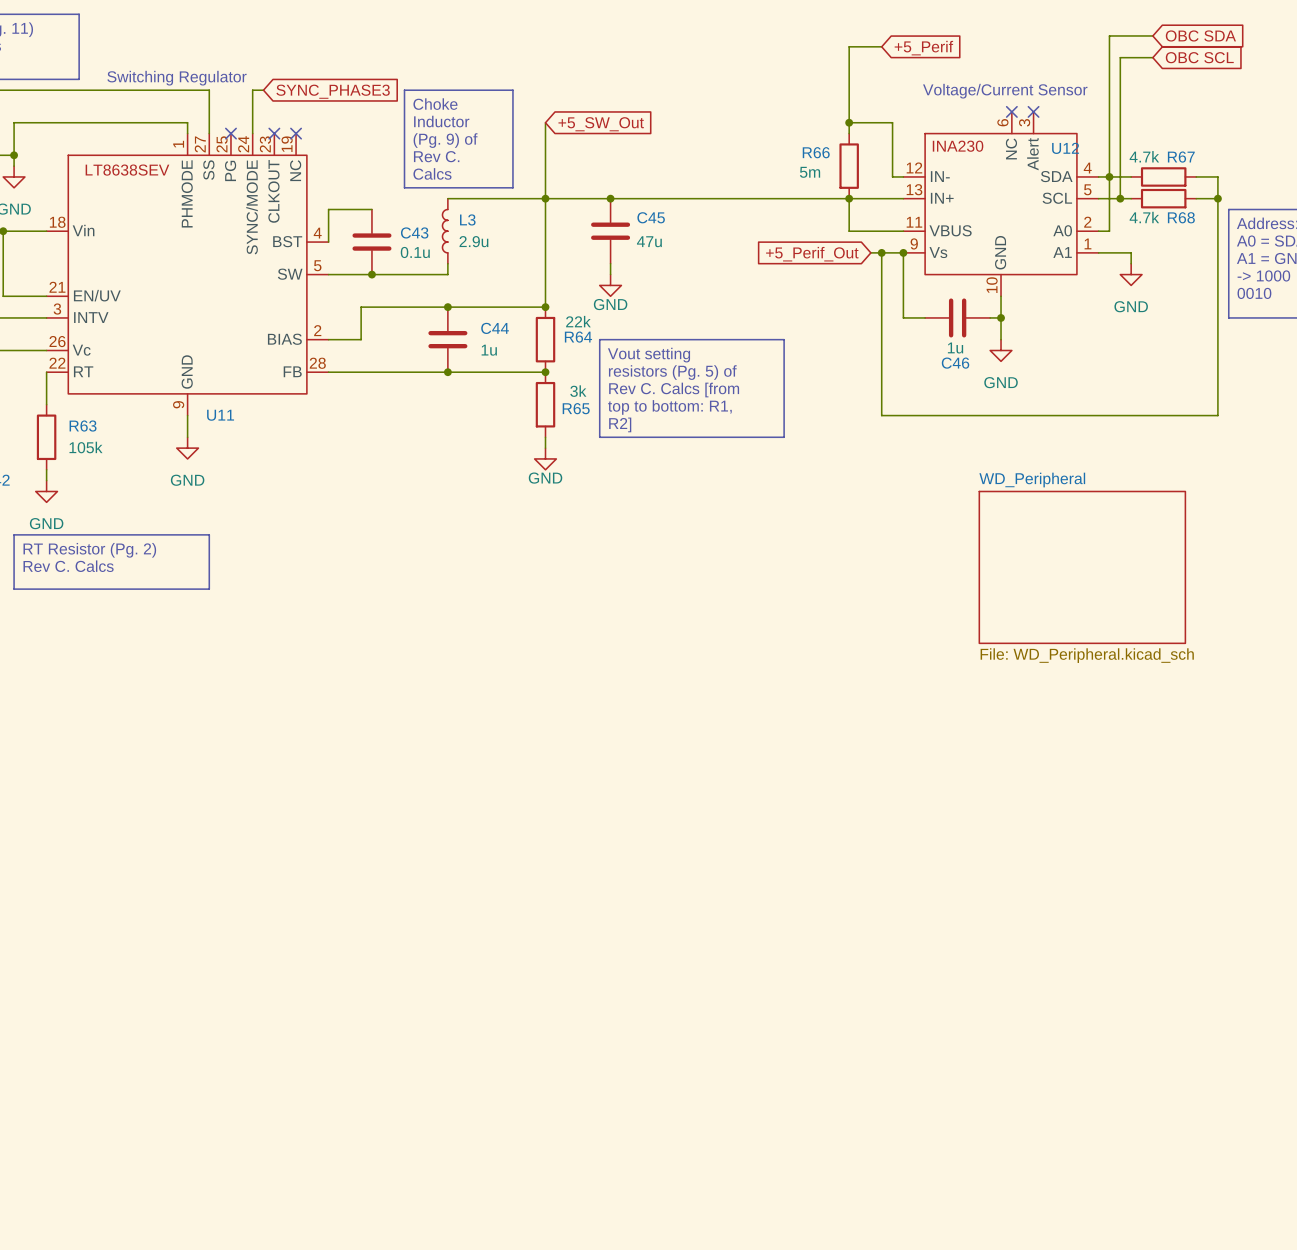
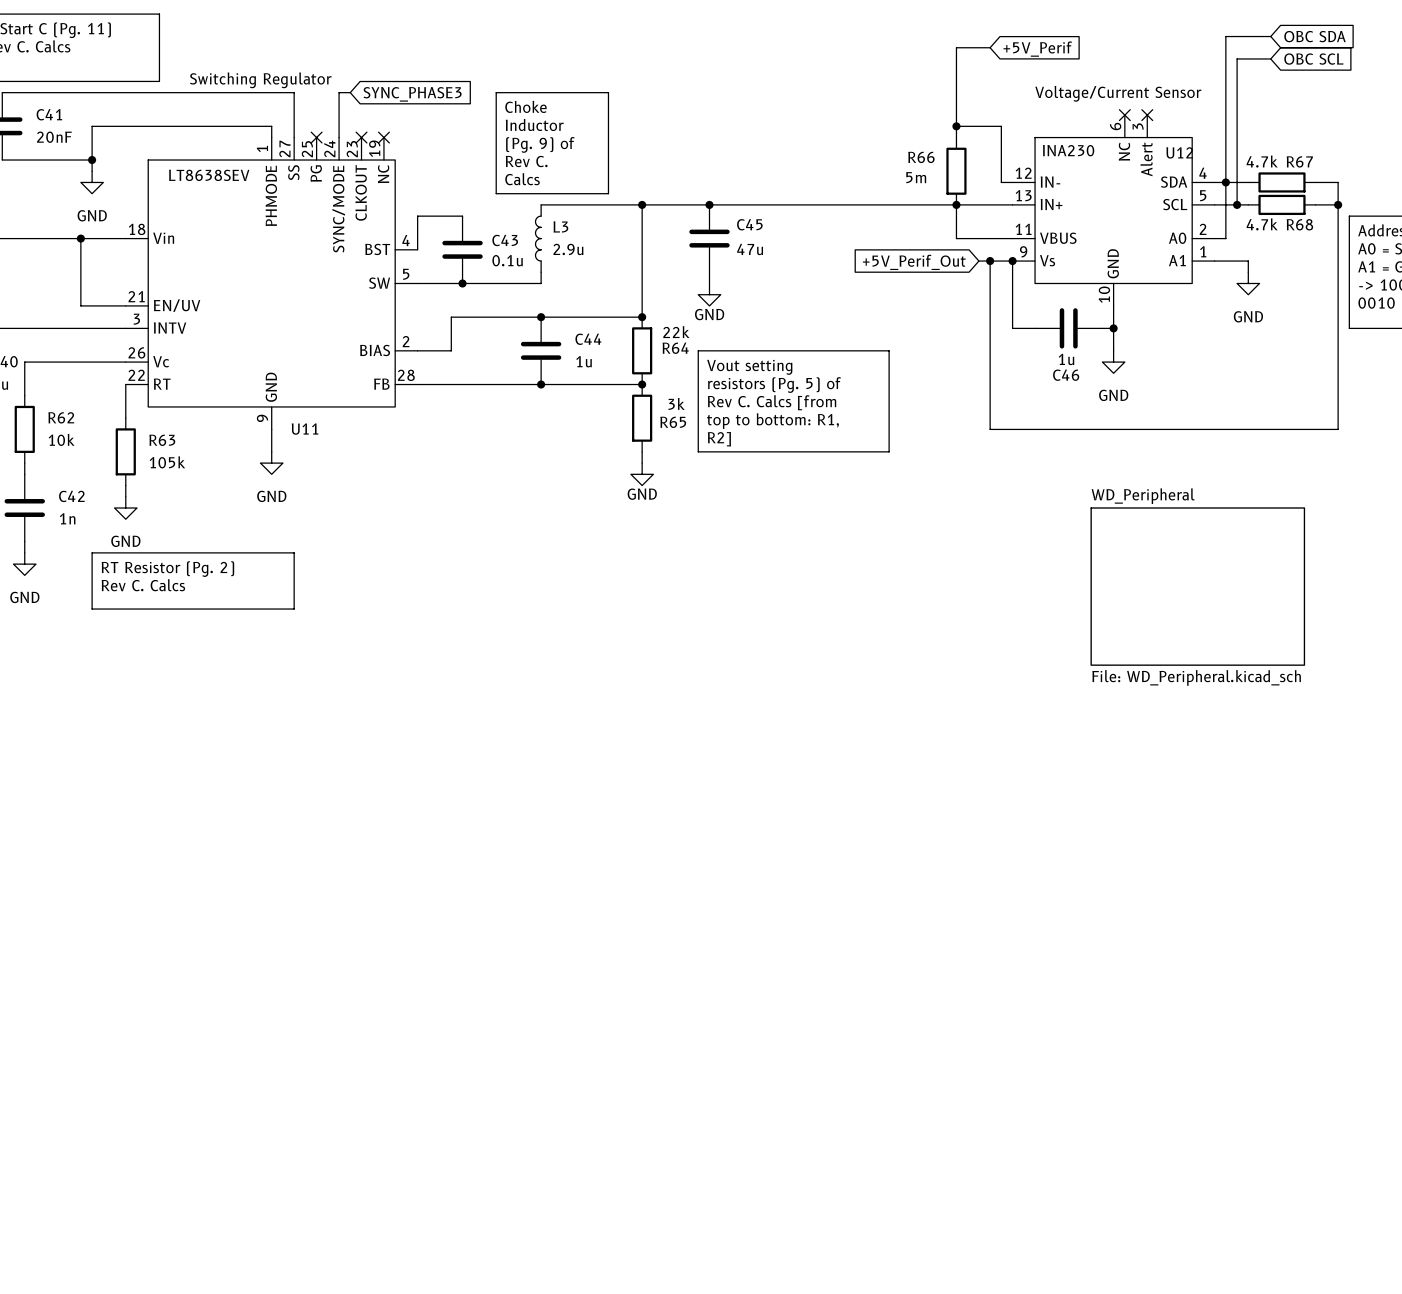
global label: +5_Perif (923, 48) -> +5V_Perif (1037, 49)
wire: (545, 122) (545, 198) -> none
global label: +5_SW_Out (601, 124) -> none
global label: +5_Perif_Out (812, 254) -> +5V_Perif_Out (914, 262)

